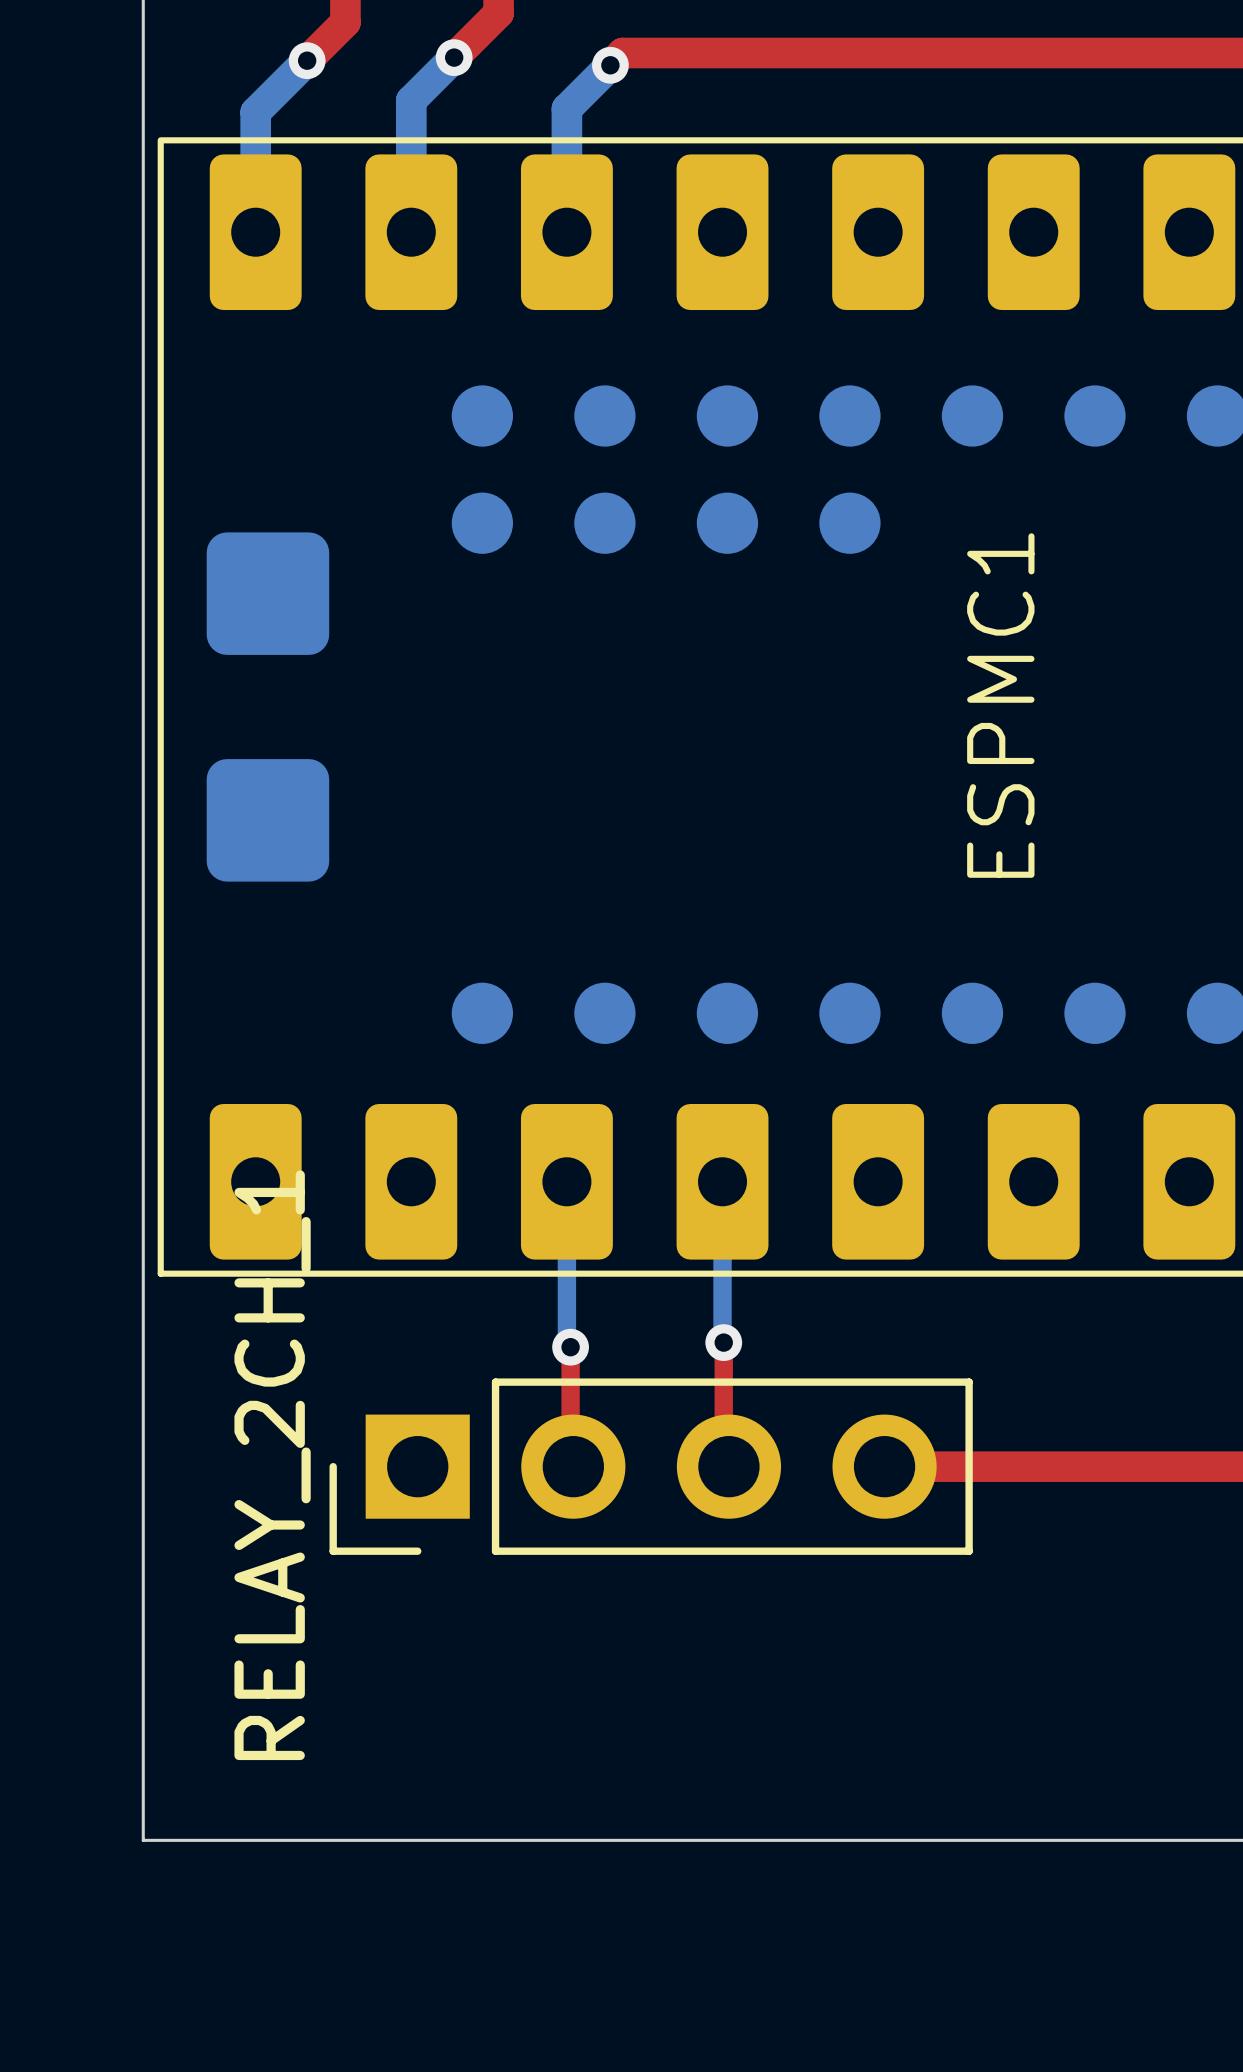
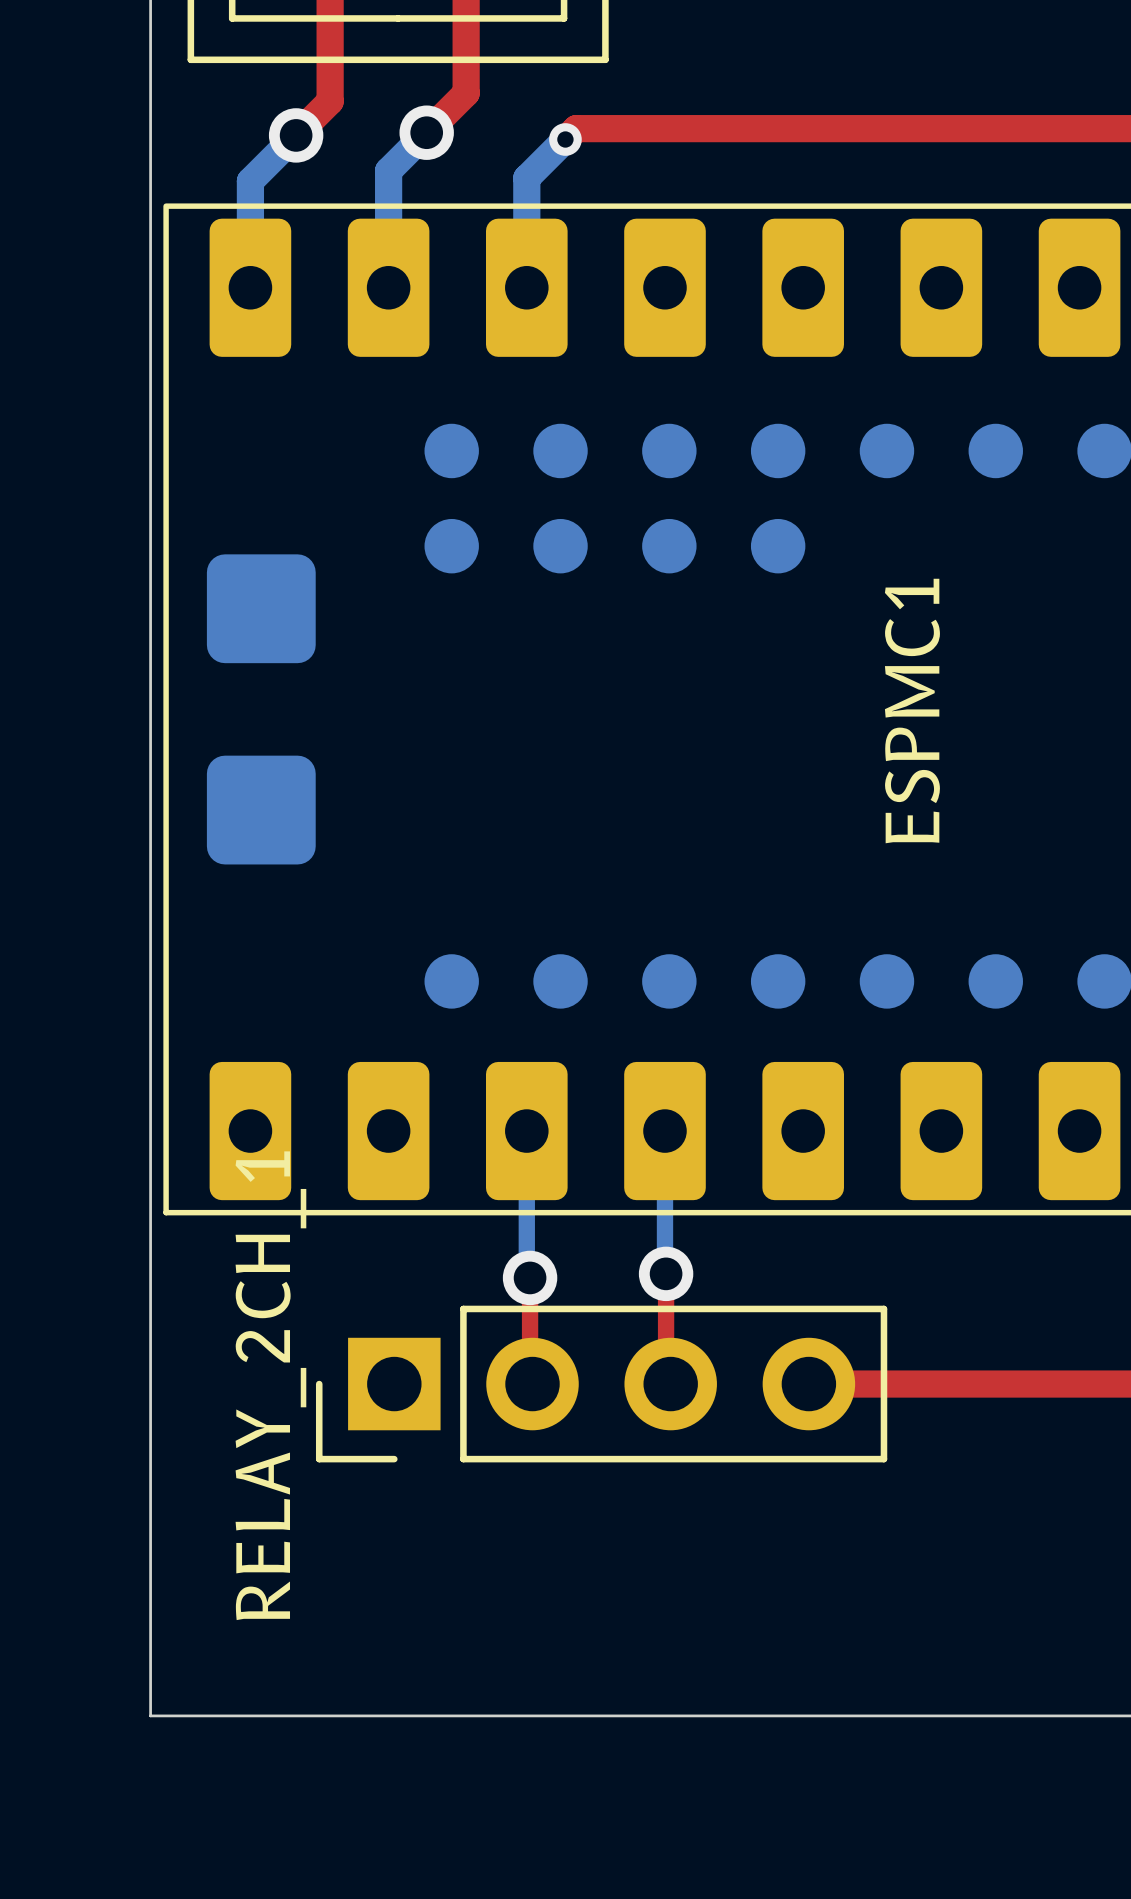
via size: [435, 39, 473, 76] -> [399, 105, 454, 160]
via size: [288, 42, 326, 80] -> [268, 108, 324, 163]
via size: [705, 1324, 743, 1361] -> [638, 1246, 694, 1302]
via size: [552, 1328, 589, 1366] -> [502, 1250, 558, 1306]

